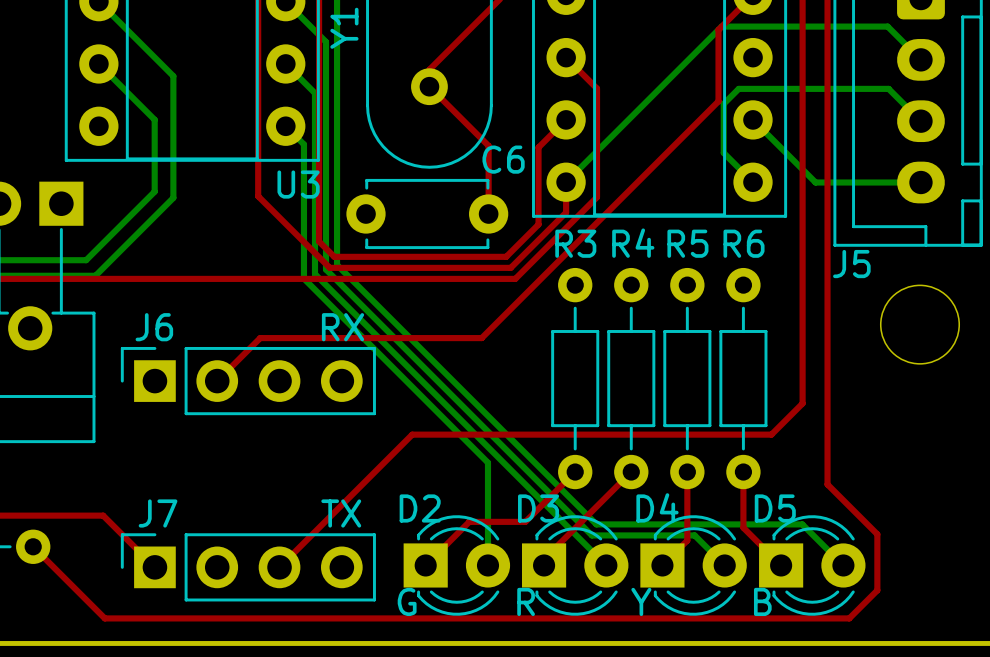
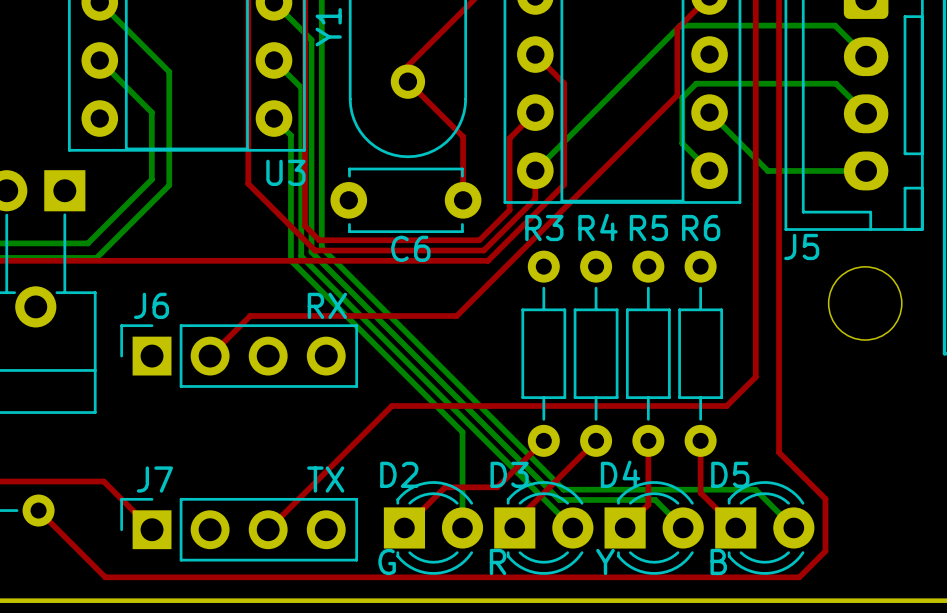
C6 name position: C6 (503, 159) -> C6 (410, 248)

